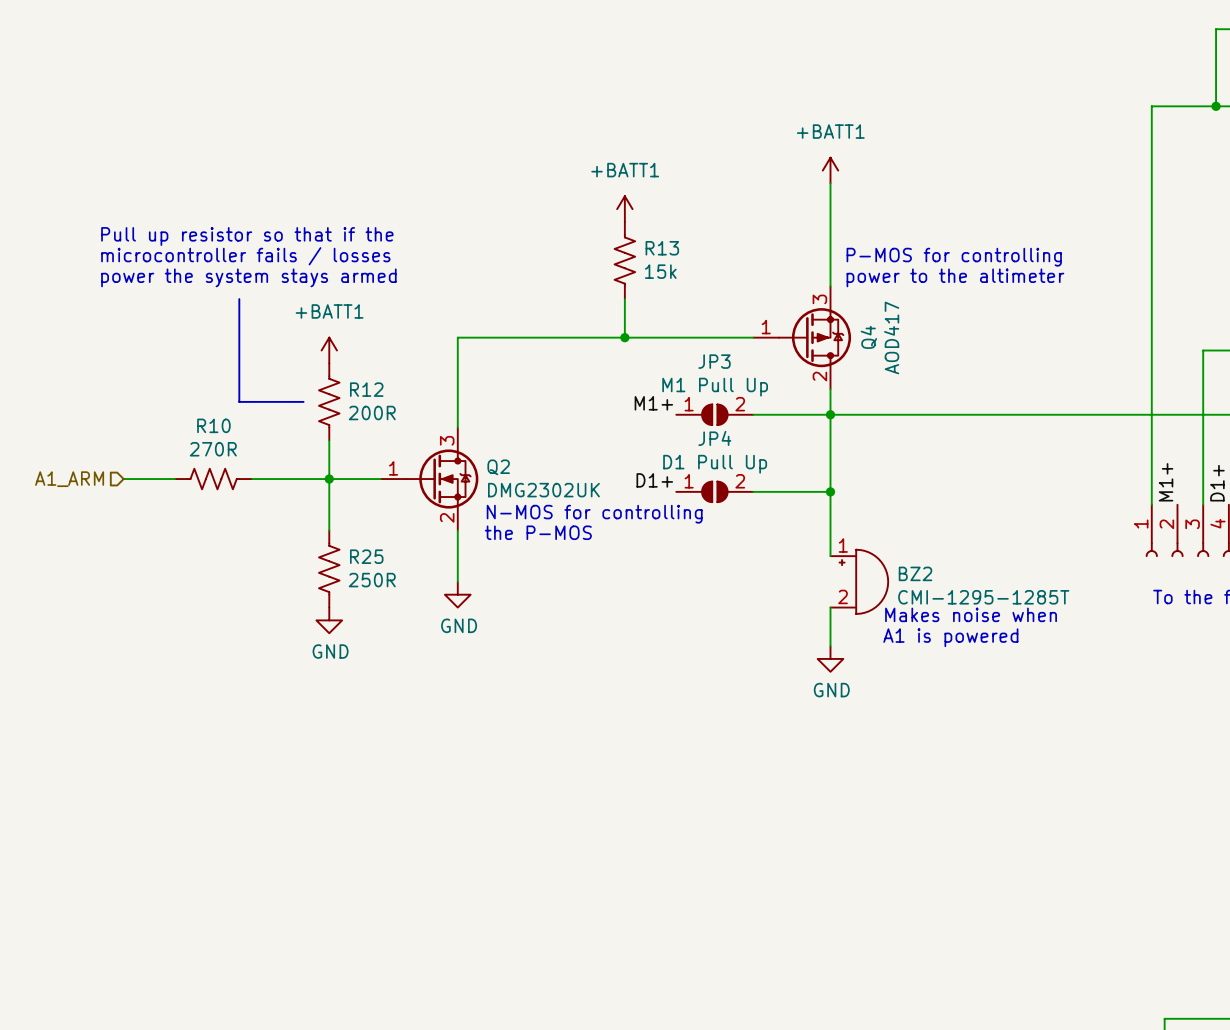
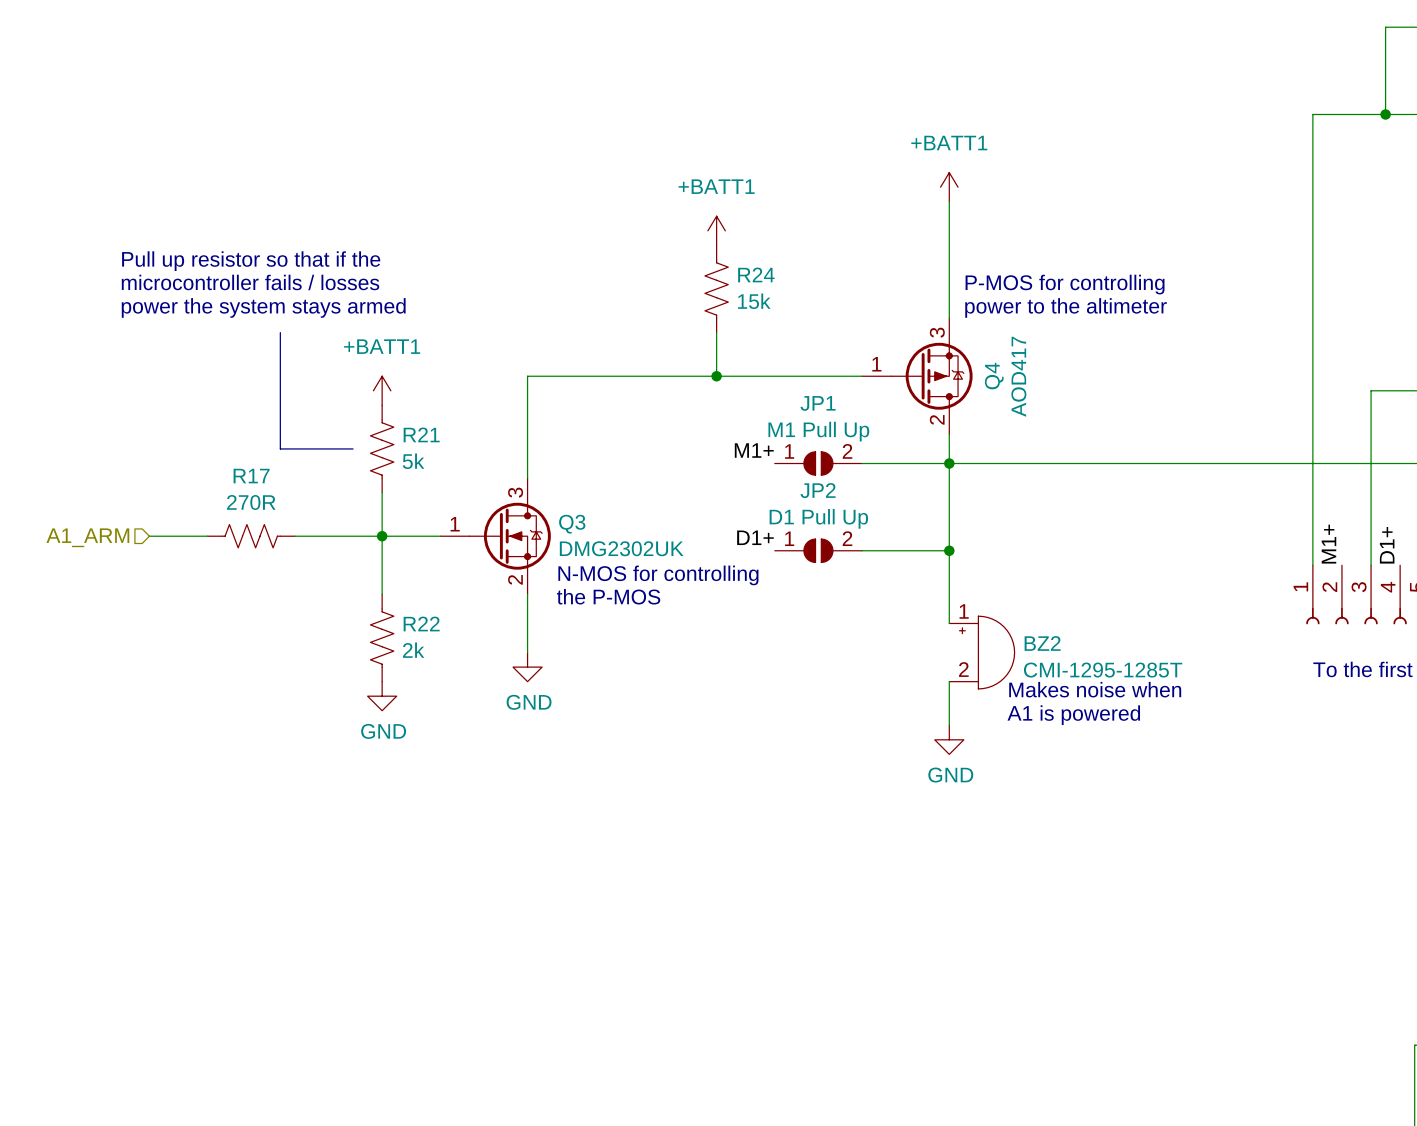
R13 name: R13 (662, 248) -> R24 (756, 274)
JP3 name: JP3 (714, 361) -> JP1 (818, 403)
R12 name: R12 (366, 389) -> R21 (421, 434)
R12 value: 200R (372, 413) -> 5k (413, 461)
R10 name: R10 (213, 425) -> R17 (251, 476)
JP4 name: JP4 (714, 438) -> JP2 (818, 490)
Q2 name: Q2 (498, 467) -> Q3 (572, 524)
R25 name: R25 (366, 556) -> R22 (421, 623)
R25 value: 250R (372, 580) -> 2k (413, 650)

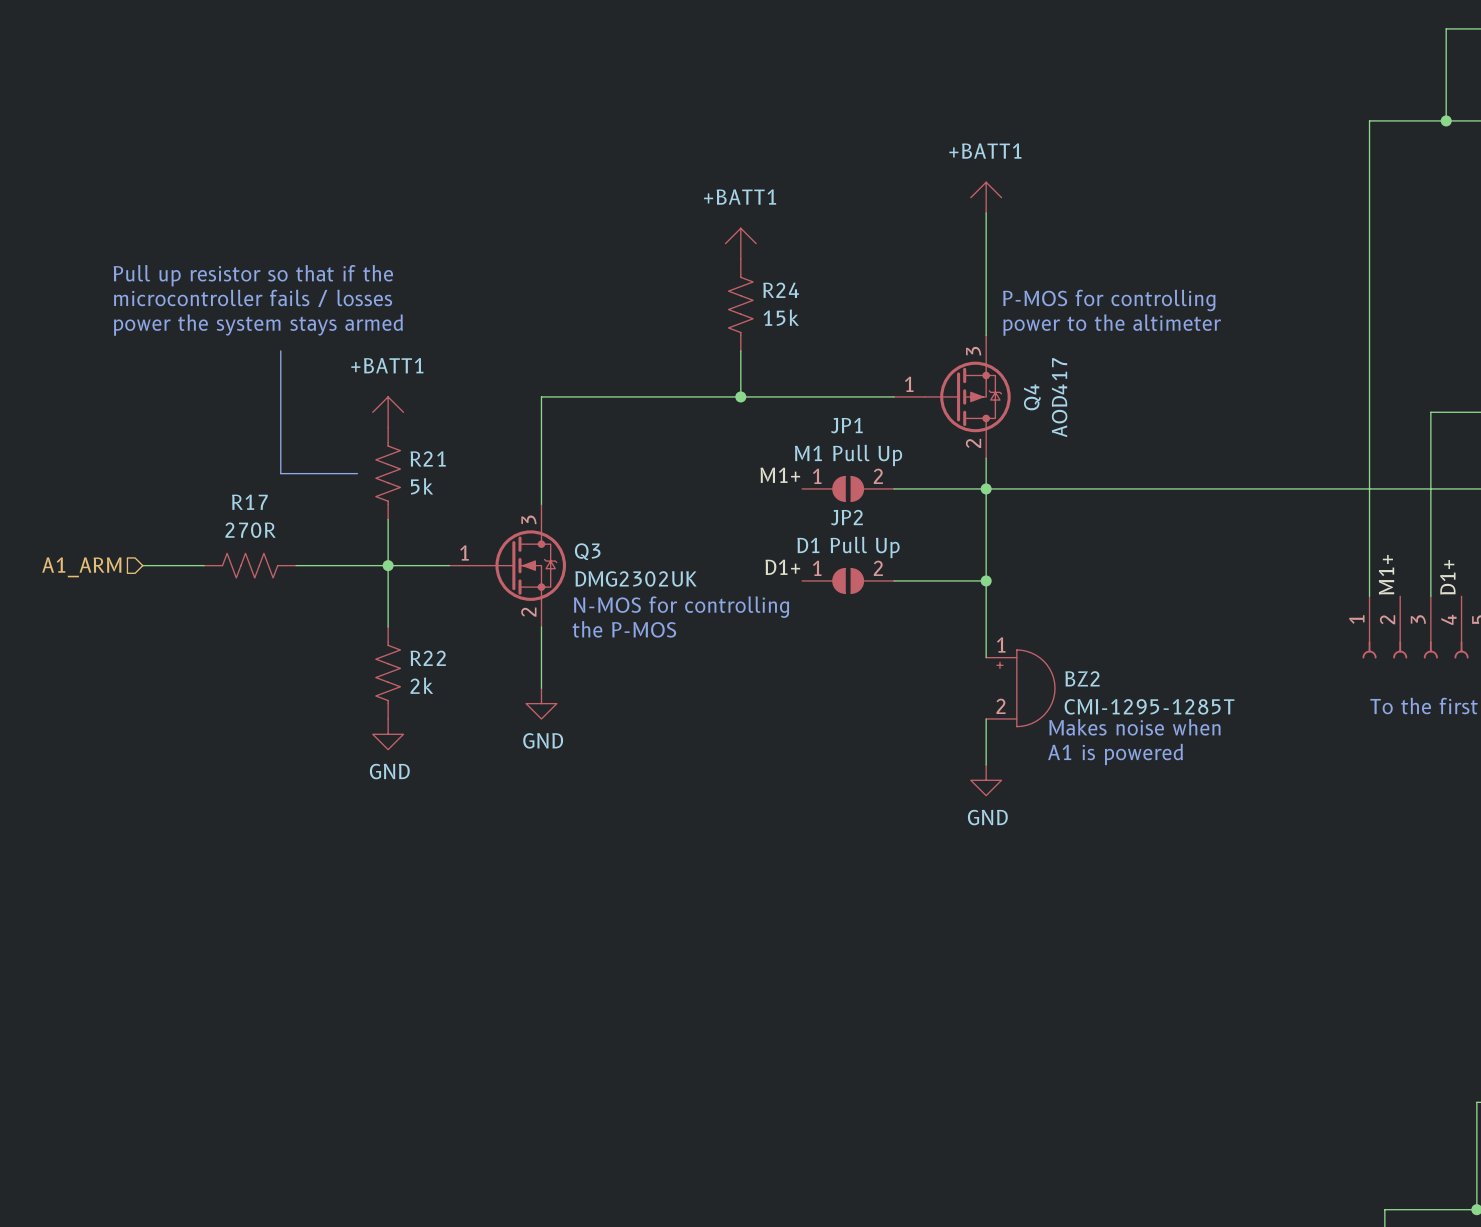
power symbol shape: [940, 172, 959, 202] -> [970, 182, 1002, 213]
power symbol shape: [707, 216, 726, 246] -> [725, 228, 757, 259]
power symbol shape: [373, 376, 391, 406] -> [372, 396, 404, 428]

